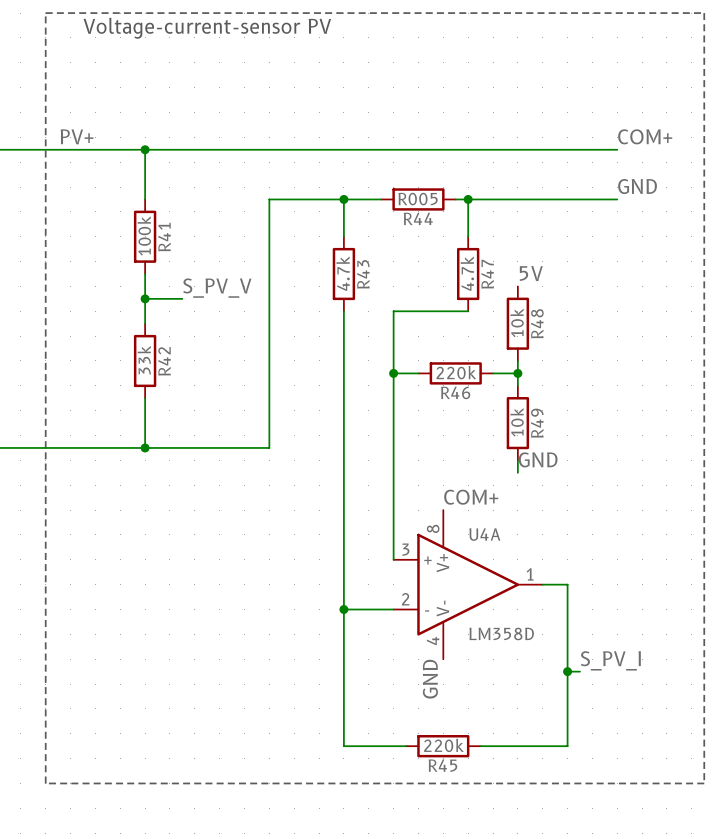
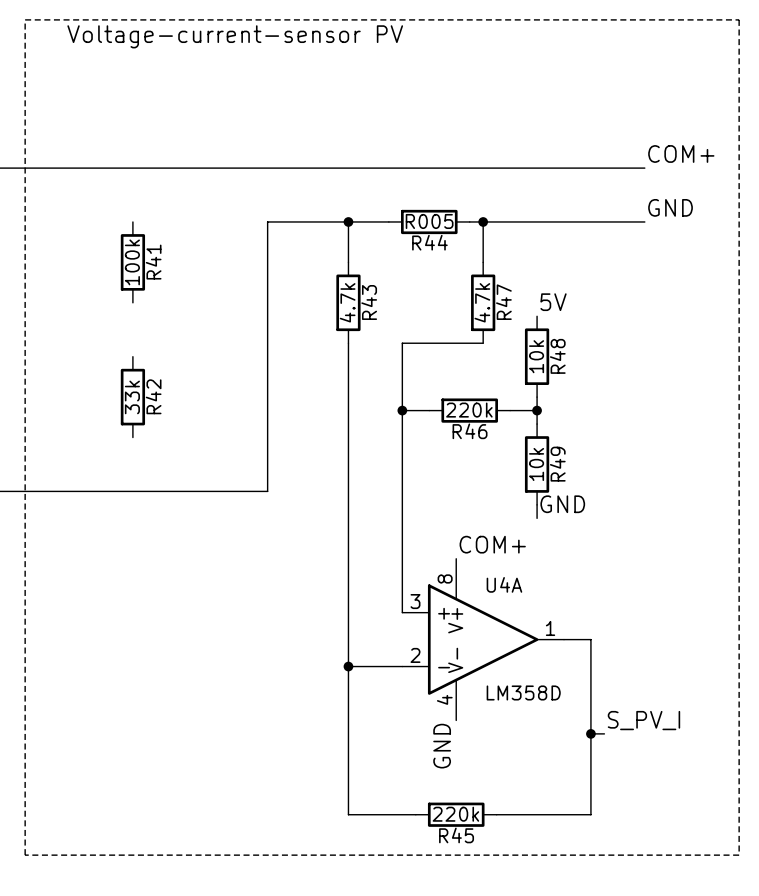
label: PV+ (77, 136) -> none
wire: (145, 149) (145, 199) -> none
junction: (145, 149) -> none
wire: (145, 274) (145, 323) -> none
label: S_PV_V (217, 288) -> none
wire: (145, 298) (182, 298) -> none
junction: (145, 298) -> none
wire: (145, 398) (145, 447) -> none
junction: (145, 447) -> none

